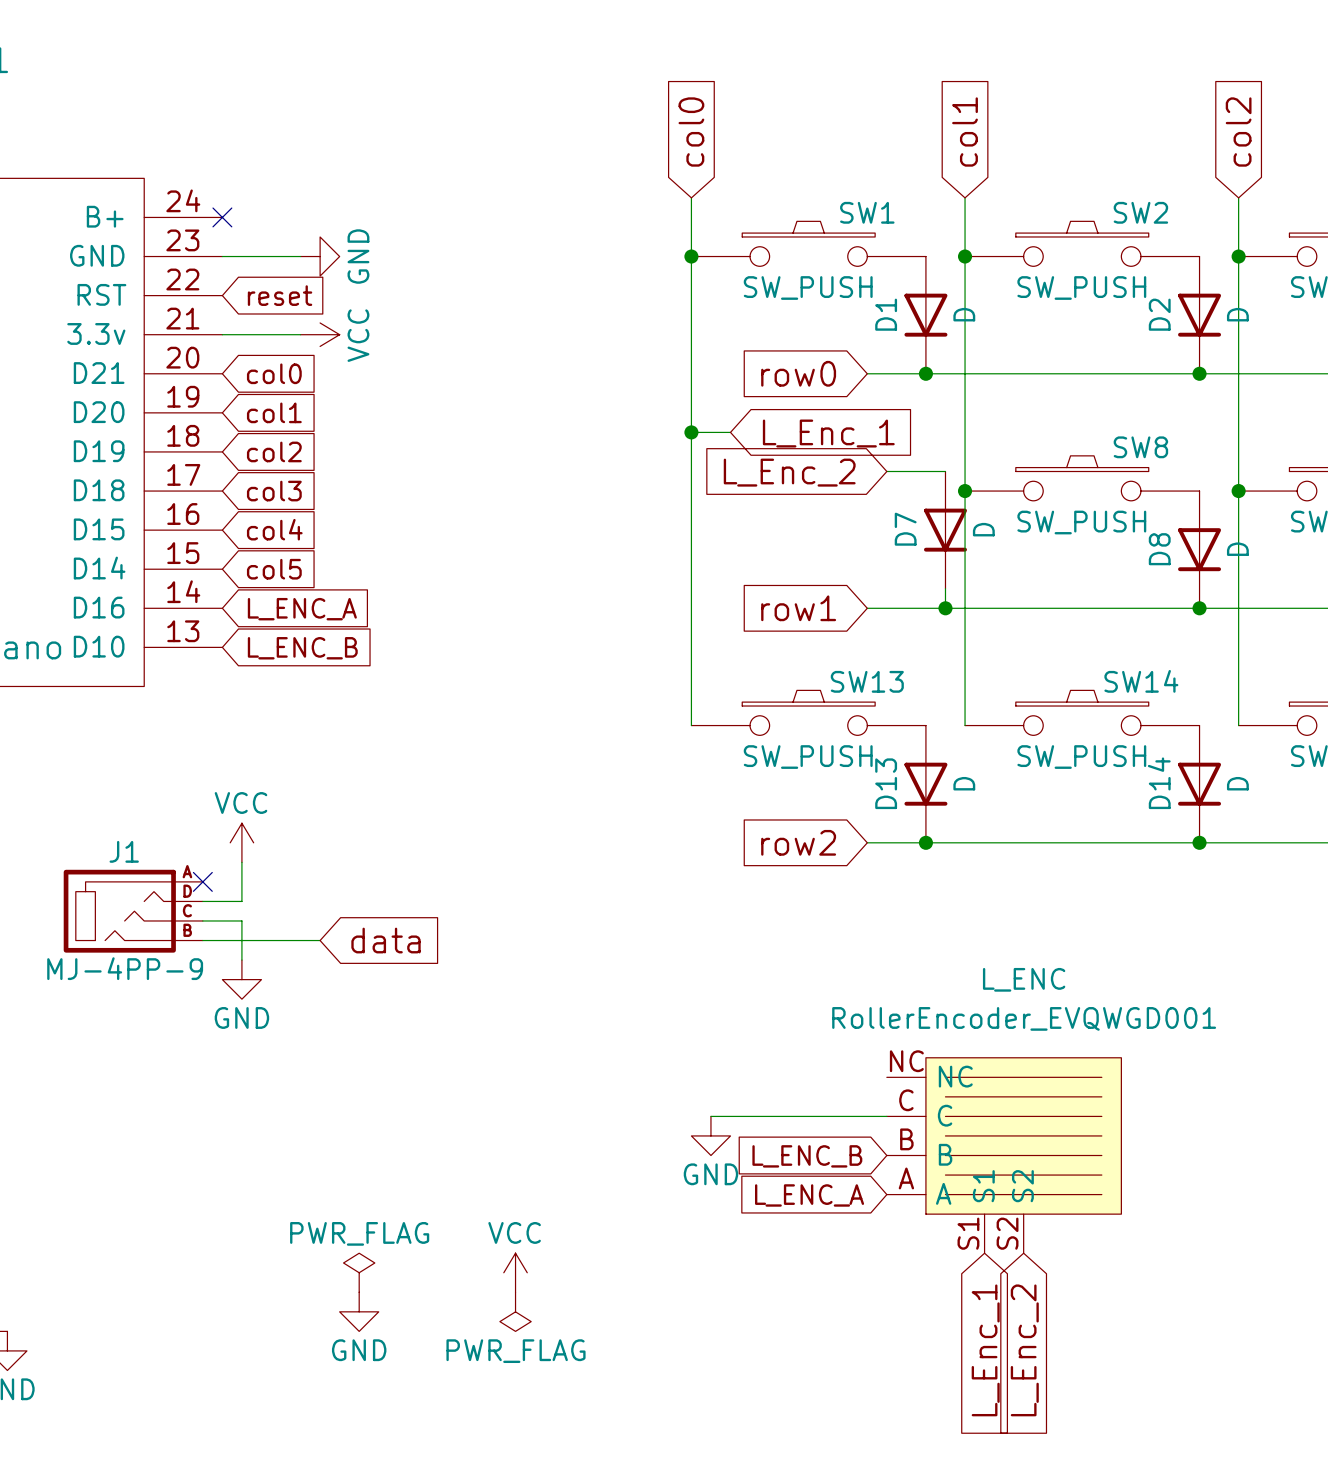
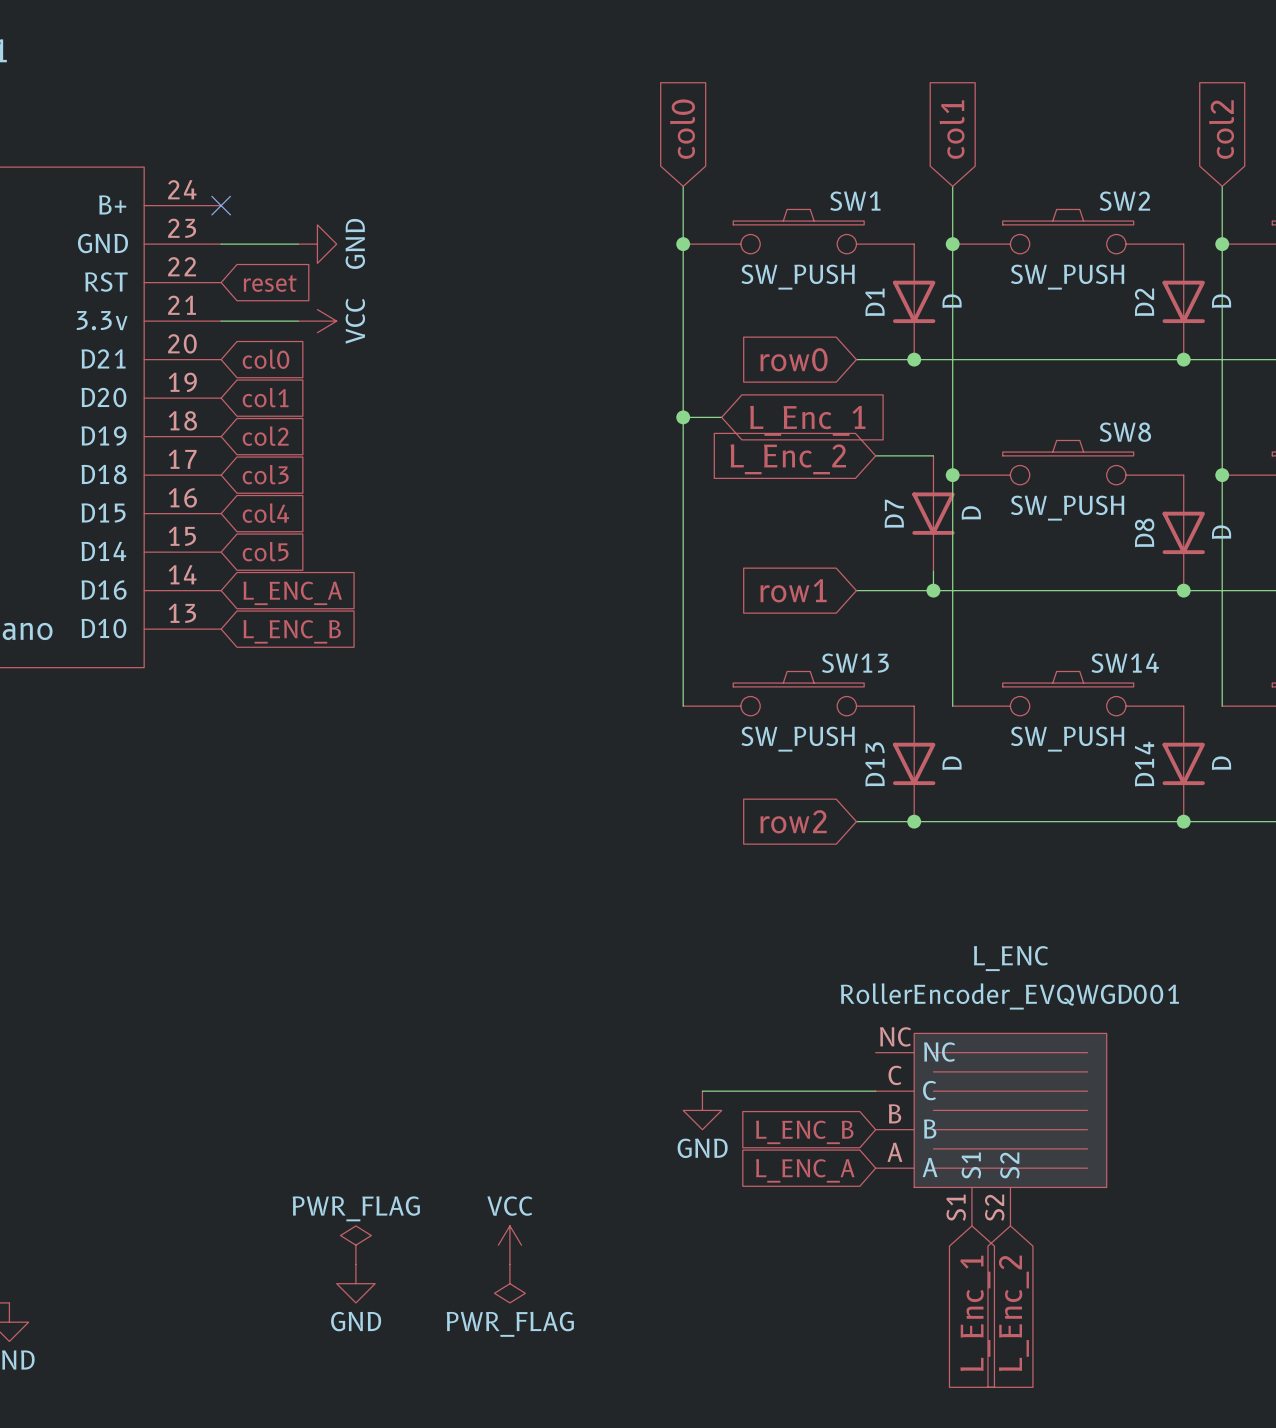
power symbol: VCC (241, 842) -> none
wire: (241, 862) (241, 901) (202, 901) -> none
no-connect mark: (202, 881) -> none
J1: MJ-4PP-9 (133, 911) -> none
wire: (202, 920) (241, 920) (241, 960) -> none
wire: (202, 940) (320, 940) -> none
global label: data (386, 940) -> none
power symbol: GND (241, 979) -> none

